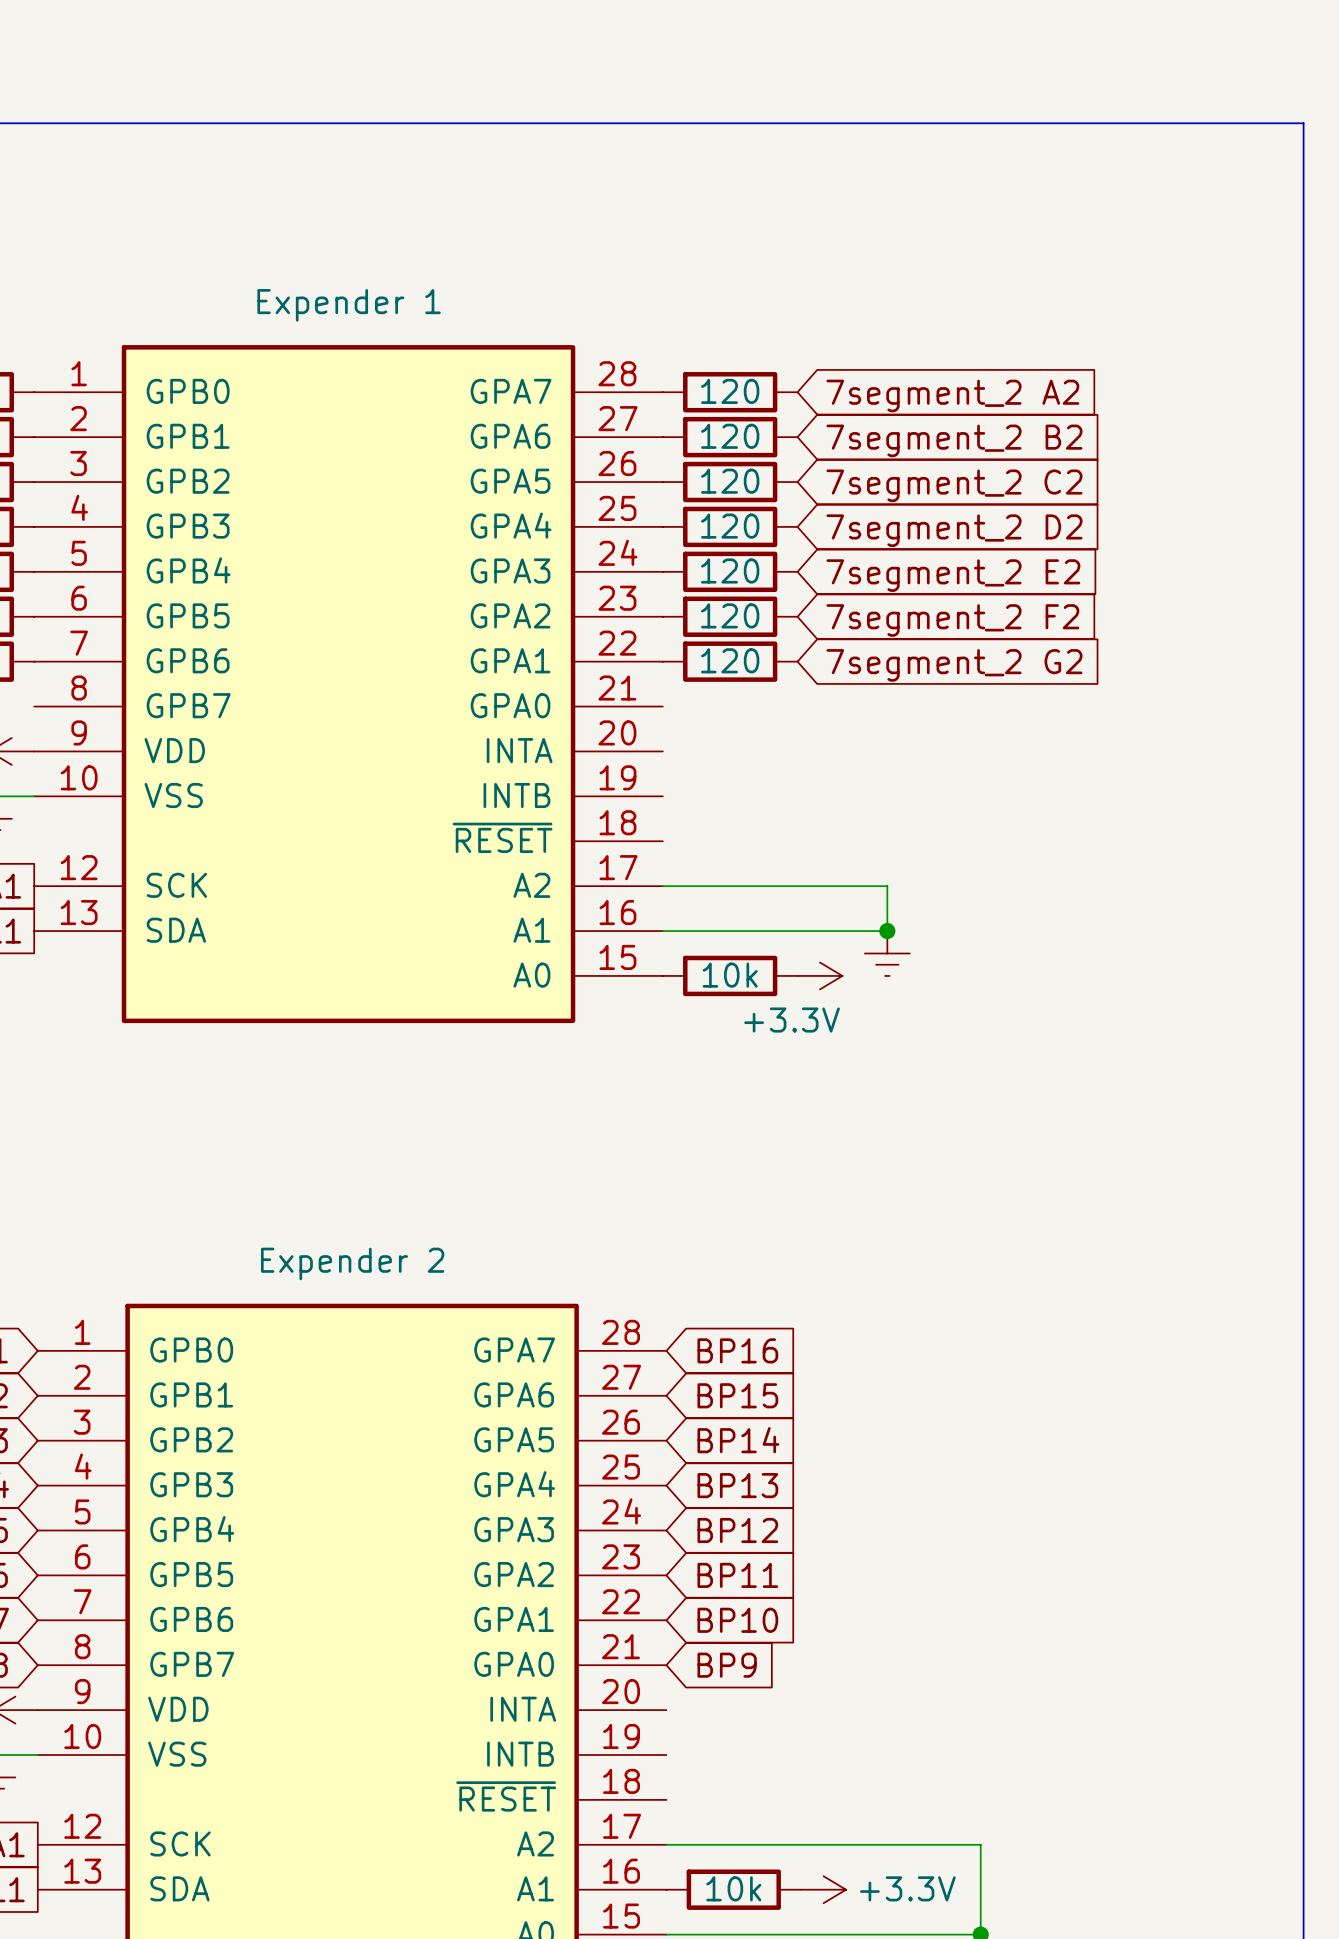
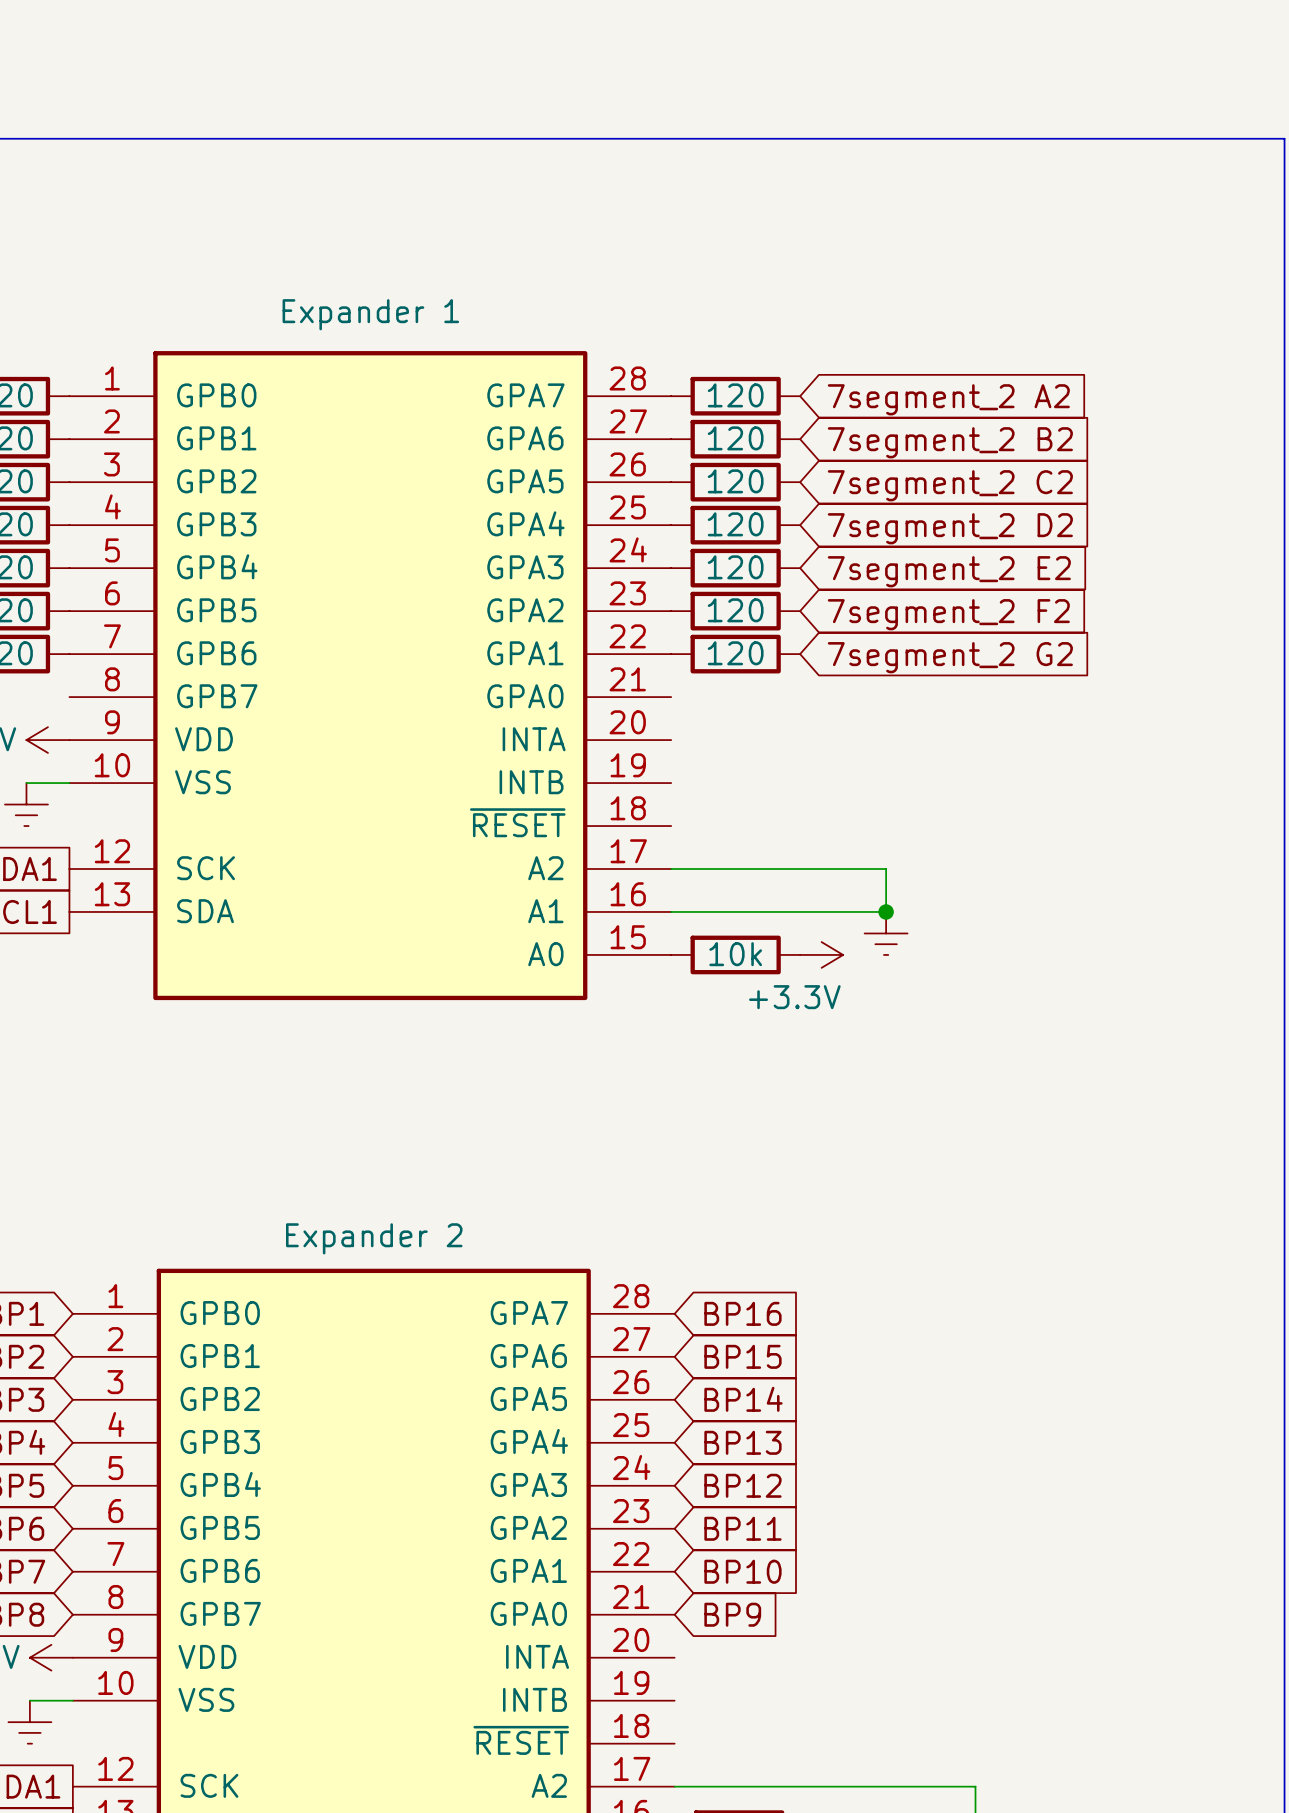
part value: Expender 1 (349, 305) -> Expander 1 (370, 314)
part value: Expender 2 (352, 1263) -> Expander 2 (374, 1238)

